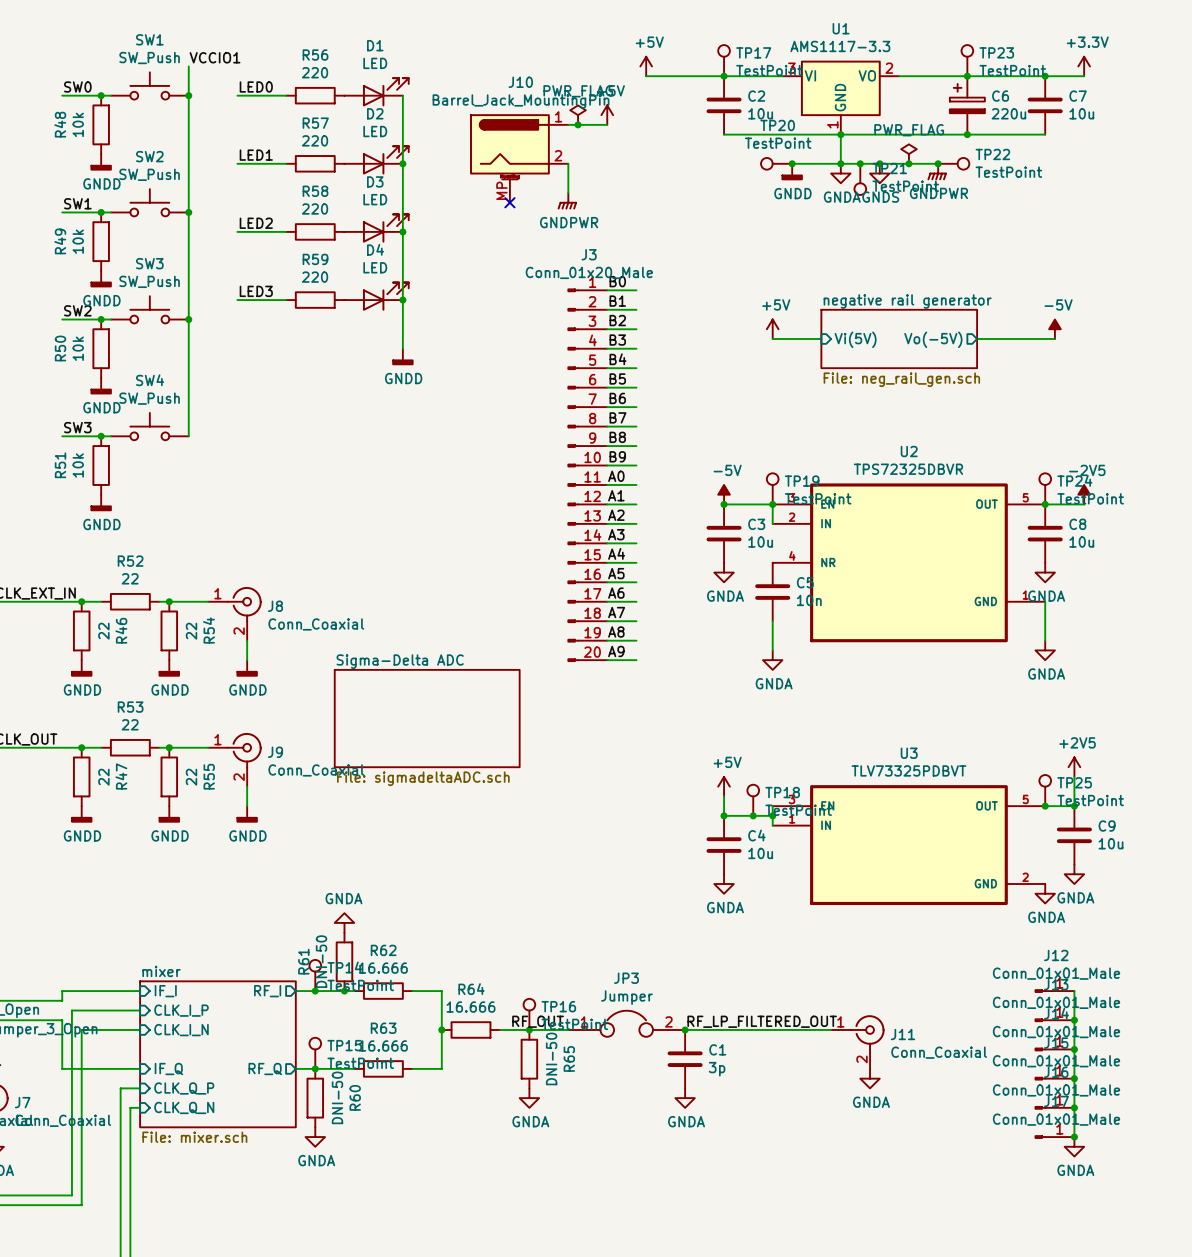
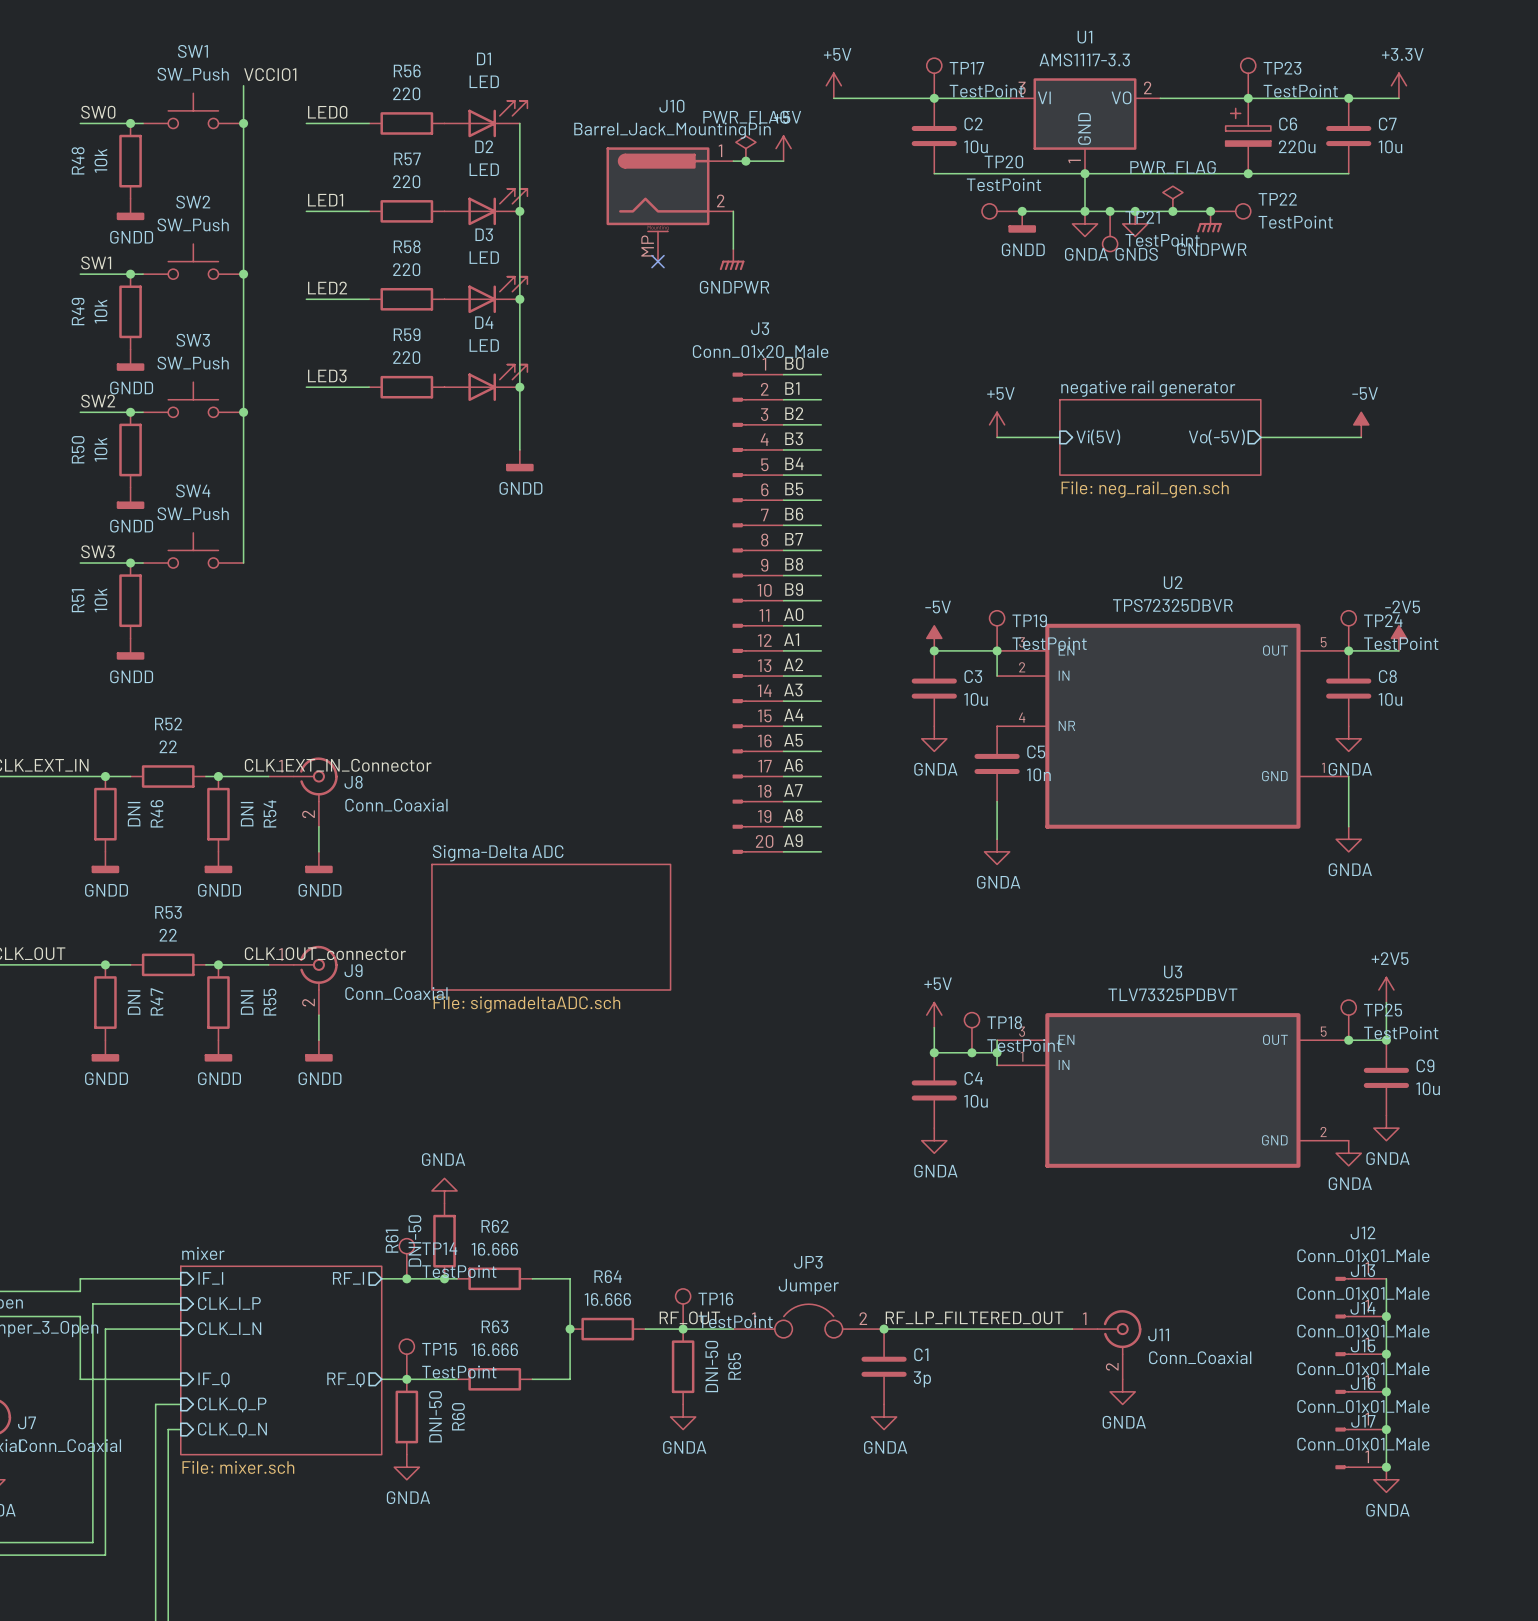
label: none -> CLK_EXT_IN_Connector (338, 765)
R46 value: 22 (103, 631) -> DNI (134, 814)
R54 value: 22 (191, 631) -> DNI (247, 814)
label: none -> CLK_OUT_connector (325, 953)
R47 value: 22 (103, 777) -> DNI (134, 1002)
R55 value: 22 (191, 777) -> DNI (247, 1002)

